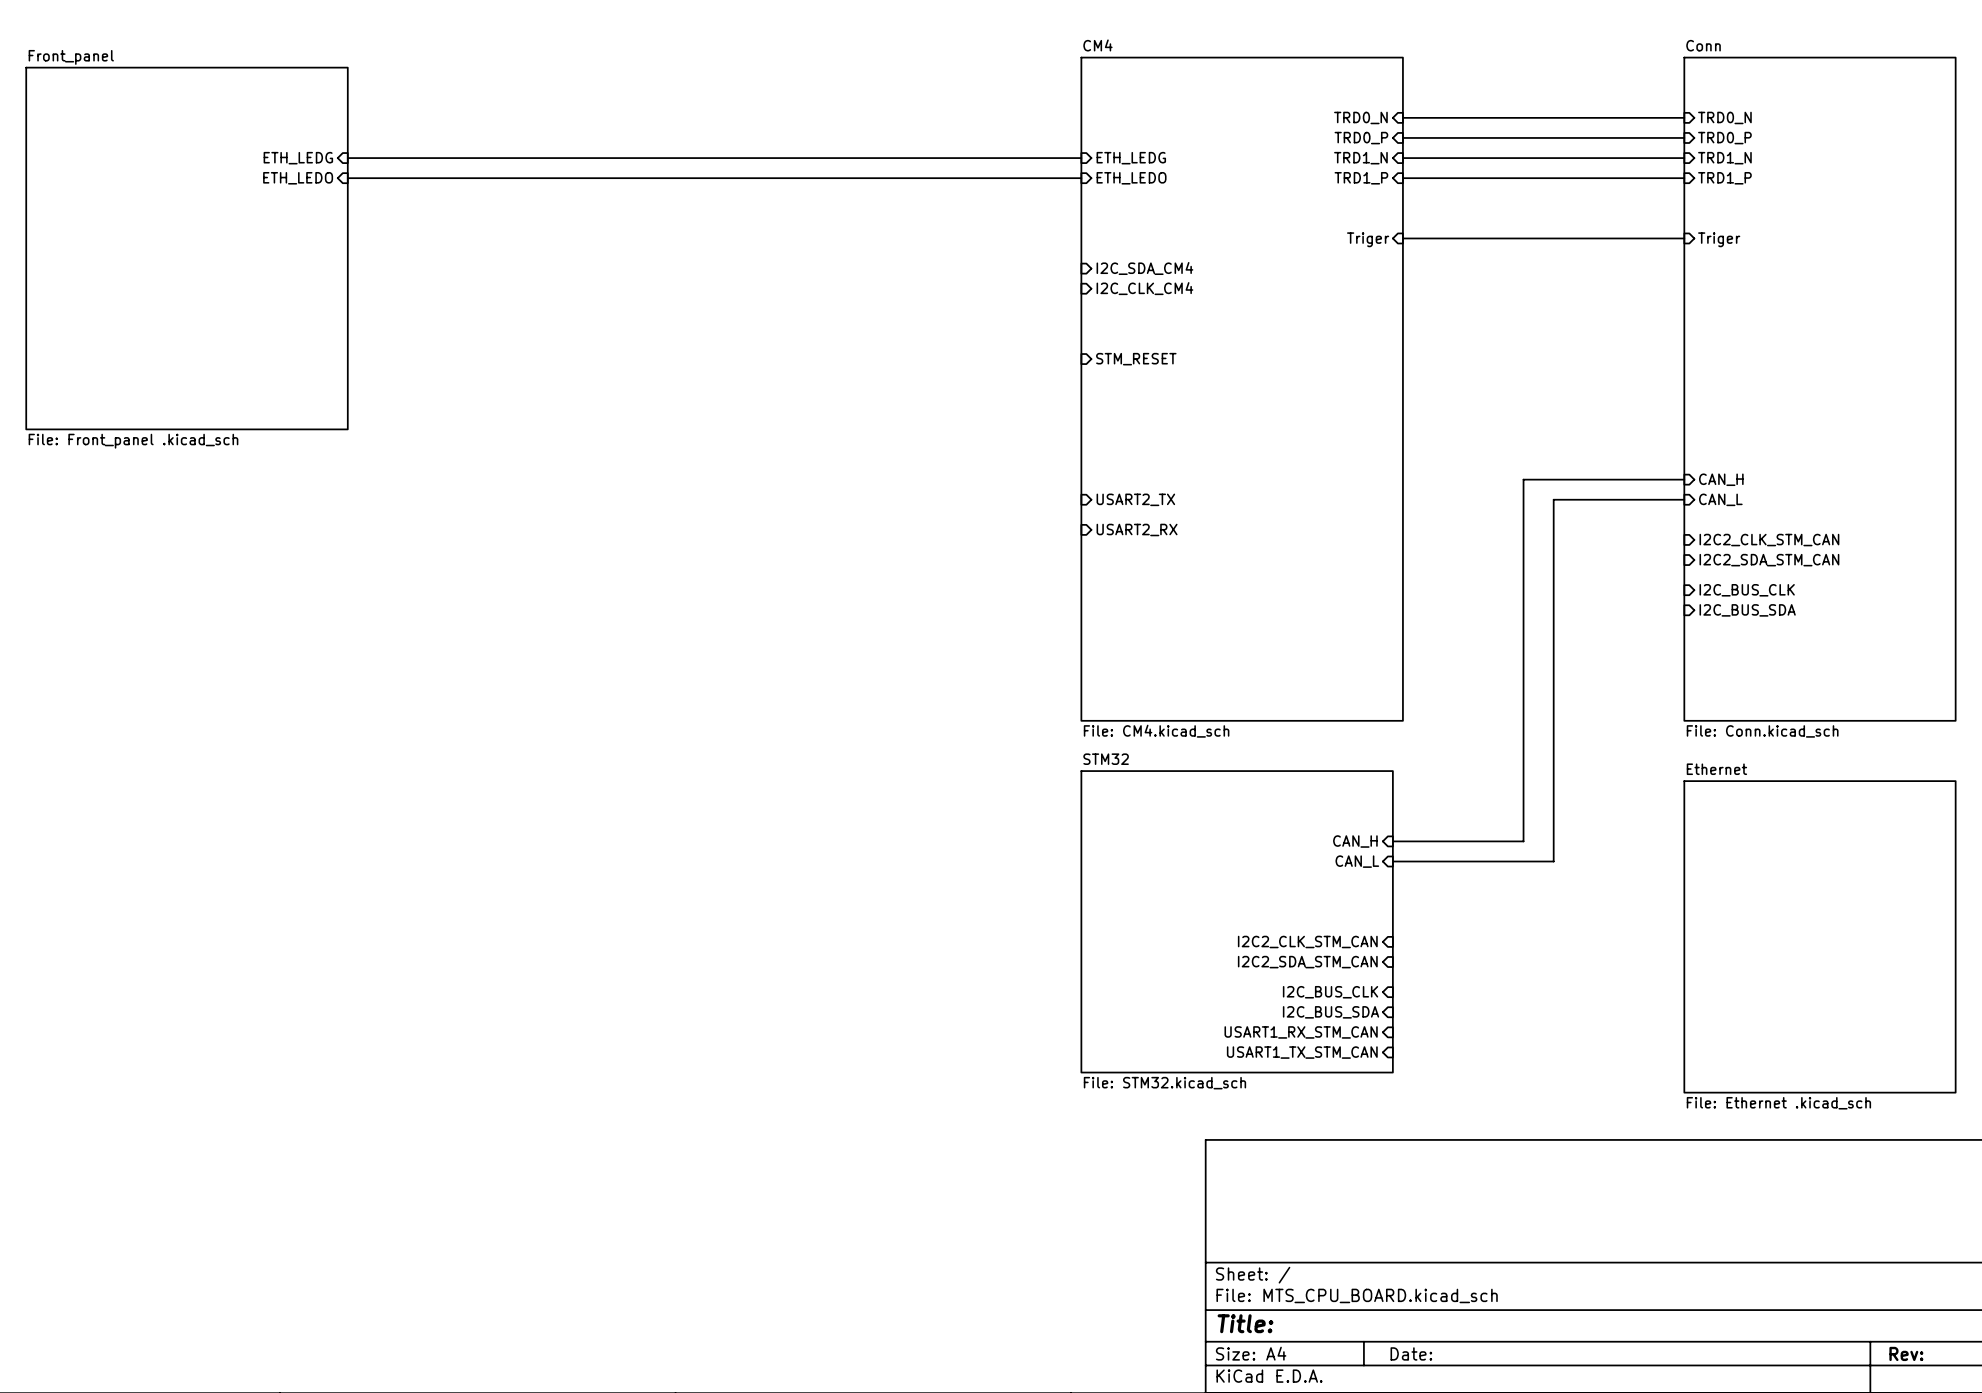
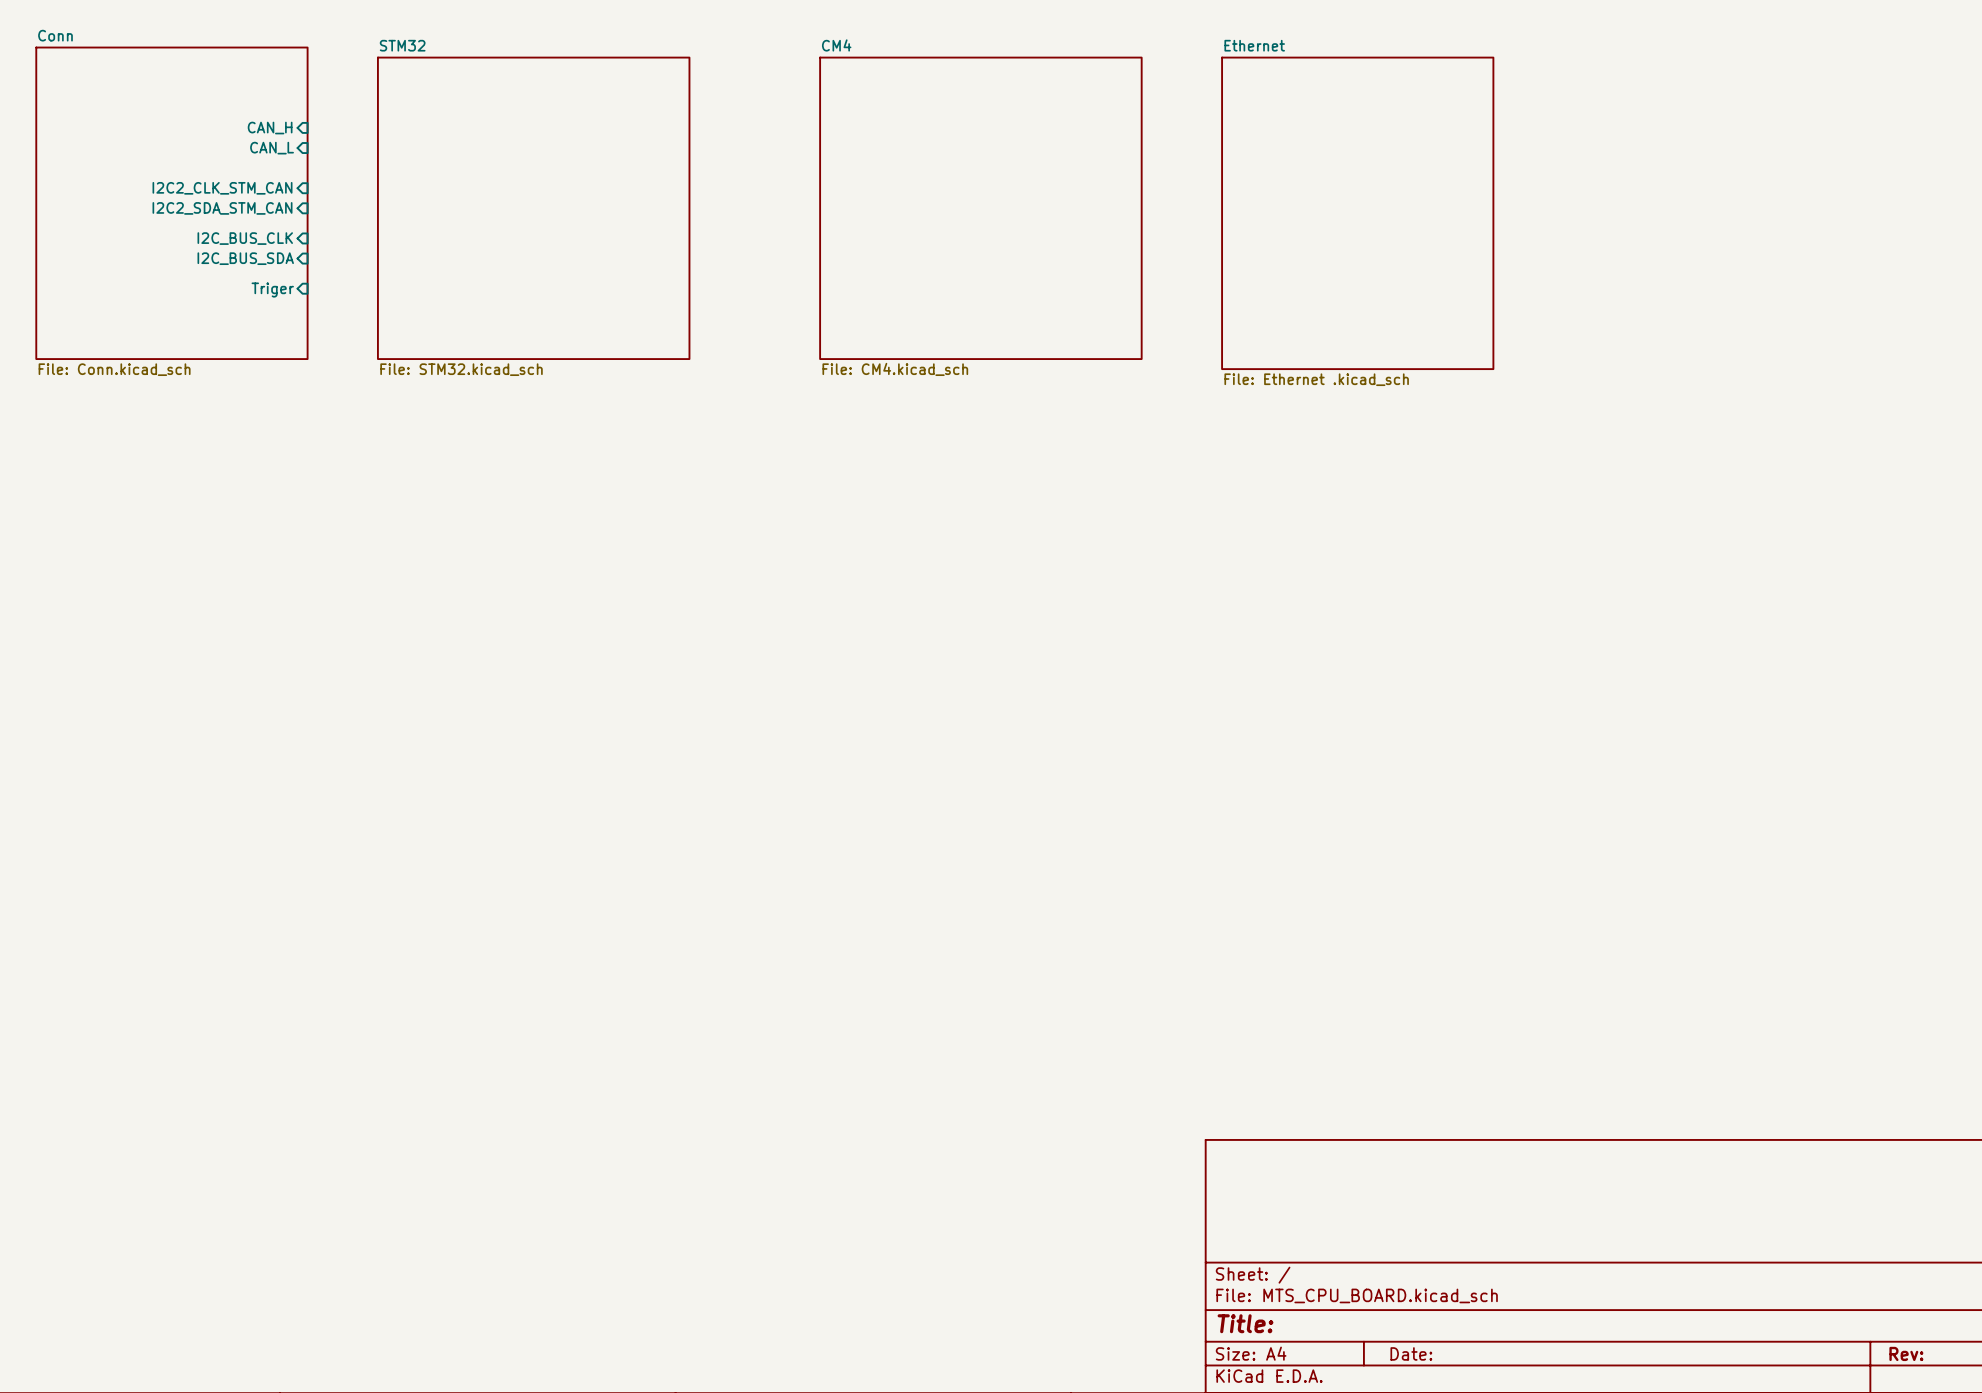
sheet CM4 name position: CM4 (1097, 45) -> CM4 (836, 45)
sheet CM4 shape: [1080, 56, 1404, 722] -> [819, 56, 1143, 360]
sheet pin: TRD0_N (1360, 117) -> none
wire: (1402, 117) (1684, 117) -> none
sheet pin: TRD0_N (1724, 117) -> none
sheet pin: none -> CAN_H (270, 128)
wire: (1402, 137) (1684, 137) -> none
sheet pin: TRD0_P (1361, 138) -> none
sheet pin: TRD0_P (1724, 138) -> none
sheet pin: none -> CAN_L (272, 148)
sheet pin: ETH_LEDG (298, 158) -> none
wire: (347, 158) (1081, 158) -> none
sheet pin: ETH_LEDG (1131, 158) -> none
sheet pin: TRD1_N (1360, 158) -> none
wire: (1402, 158) (1684, 158) -> none
sheet pin: TRD1_N (1724, 158) -> none
sheet pin: ETH_LEDO (298, 178) -> none
wire: (347, 178) (1081, 178) -> none
sheet pin: ETH_LEDO (1131, 178) -> none
sheet pin: TRD1_P (1361, 178) -> none
wire: (1402, 178) (1684, 178) -> none
sheet pin: TRD1_P (1724, 178) -> none
sheet pin: none -> I2C2_CLK_STM_CAN (222, 188)
sheet Conn: none -> File: Conn.kicad_sch (171, 203)
sheet pin: none -> I2C2_SDA_STM_CAN (222, 208)
sheet Ethernet: none -> File: Ethernet .kicad_sch (1357, 213)
sheet pin: none -> I2C_BUS_CLK (245, 238)
wire: (1402, 238) (1684, 238) -> none
sheet pin: Triger (1368, 239) -> none
sheet pin: Triger (1719, 239) -> none
sheet Front_panel: File: Front_panel .kicad_sch (187, 248) -> none
sheet pin: none -> I2C_BUS_SDA (245, 258)
sheet pin: I2C_SDA_CM4 (1144, 268) -> none
sheet pin: I2C_CLK_CM4 (1144, 288) -> none
sheet pin: none -> Triger (272, 290)
sheet pin: STM_RESET (1136, 359) -> none
sheet Conn: File: Conn.kicad_sch (1819, 389) -> none
wire: (1684, 479) (1523, 479) (1523, 841) (1392, 841) -> none
sheet pin: CAN_H (1721, 479) -> none
sheet pin: USART2_TX (1135, 499) -> none
wire: (1684, 499) (1553, 499) (1553, 861) (1392, 861) -> none
sheet pin: CAN_L (1720, 499) -> none
sheet pin: USART2_RX (1137, 529) -> none
sheet pin: I2C2_CLK_STM_CAN (1769, 540) -> none
sheet pin: I2C2_SDA_STM_CAN (1769, 560) -> none
sheet pin: I2C_BUS_CLK (1747, 590) -> none
sheet pin: I2C_BUS_SDA (1747, 610) -> none
sheet CM4 value position: File: CM4.kicad_sch (1156, 731) -> File: CM4.kicad_sch (895, 369)
sheet pin: CAN_H (1355, 841) -> none
sheet pin: CAN_L (1357, 861) -> none
sheet STM32 position: (1237, 921) -> (533, 208)
sheet Ethernet: File: Ethernet .kicad_sch (1819, 936) -> none
sheet pin: I2C2_CLK_STM_CAN (1307, 942) -> none
sheet pin: I2C2_SDA_STM_CAN (1307, 962) -> none
sheet pin: I2C_BUS_CLK (1330, 992) -> none
sheet pin: I2C_BUS_SDA (1331, 1012) -> none
sheet pin: USART1_RX_STM_CAN (1301, 1032) -> none
sheet pin: USART1_TX_STM_CAN (1302, 1052) -> none

